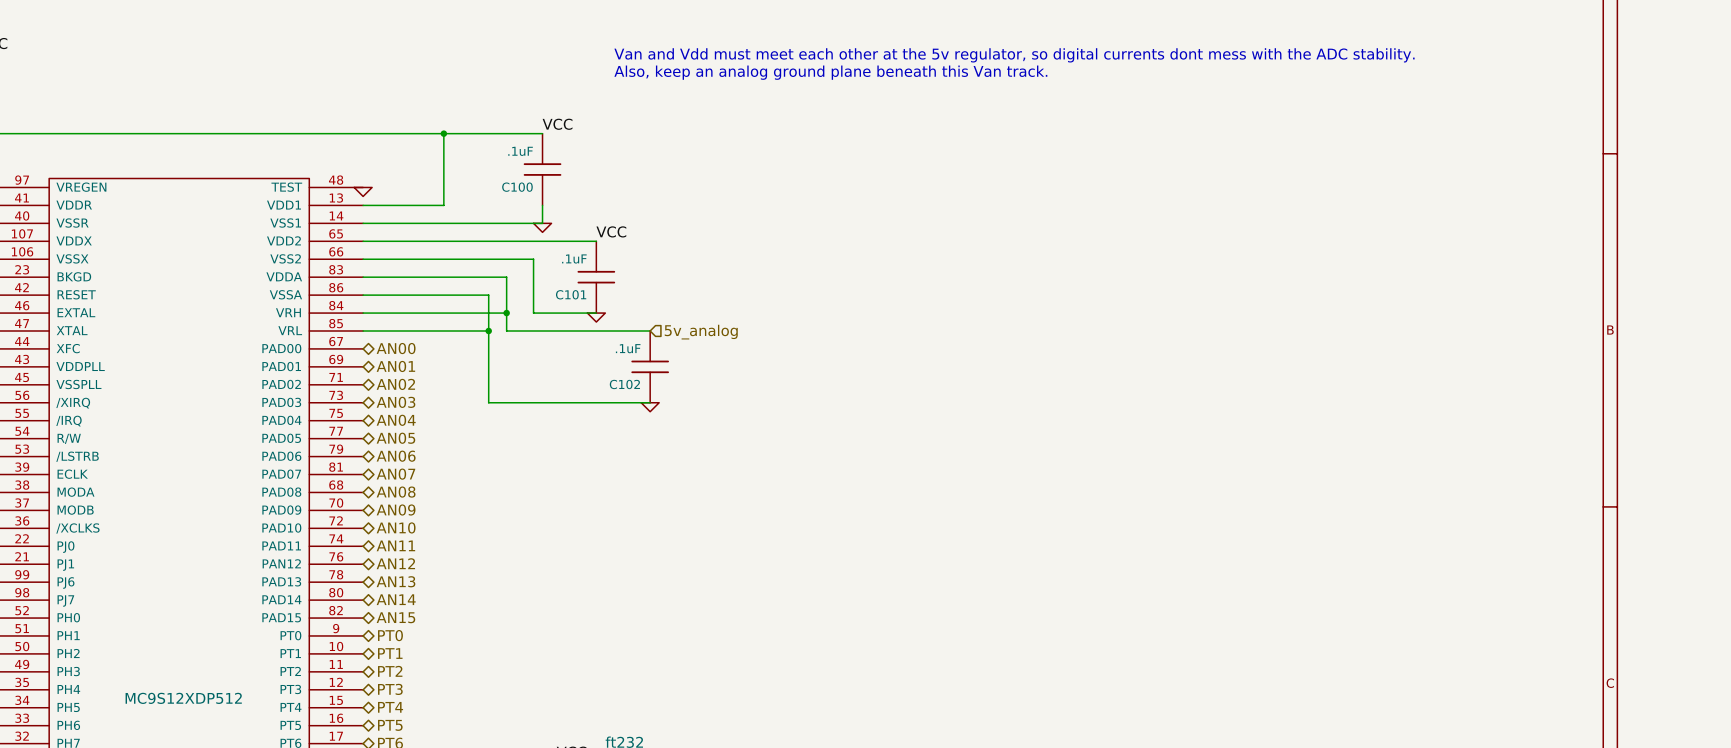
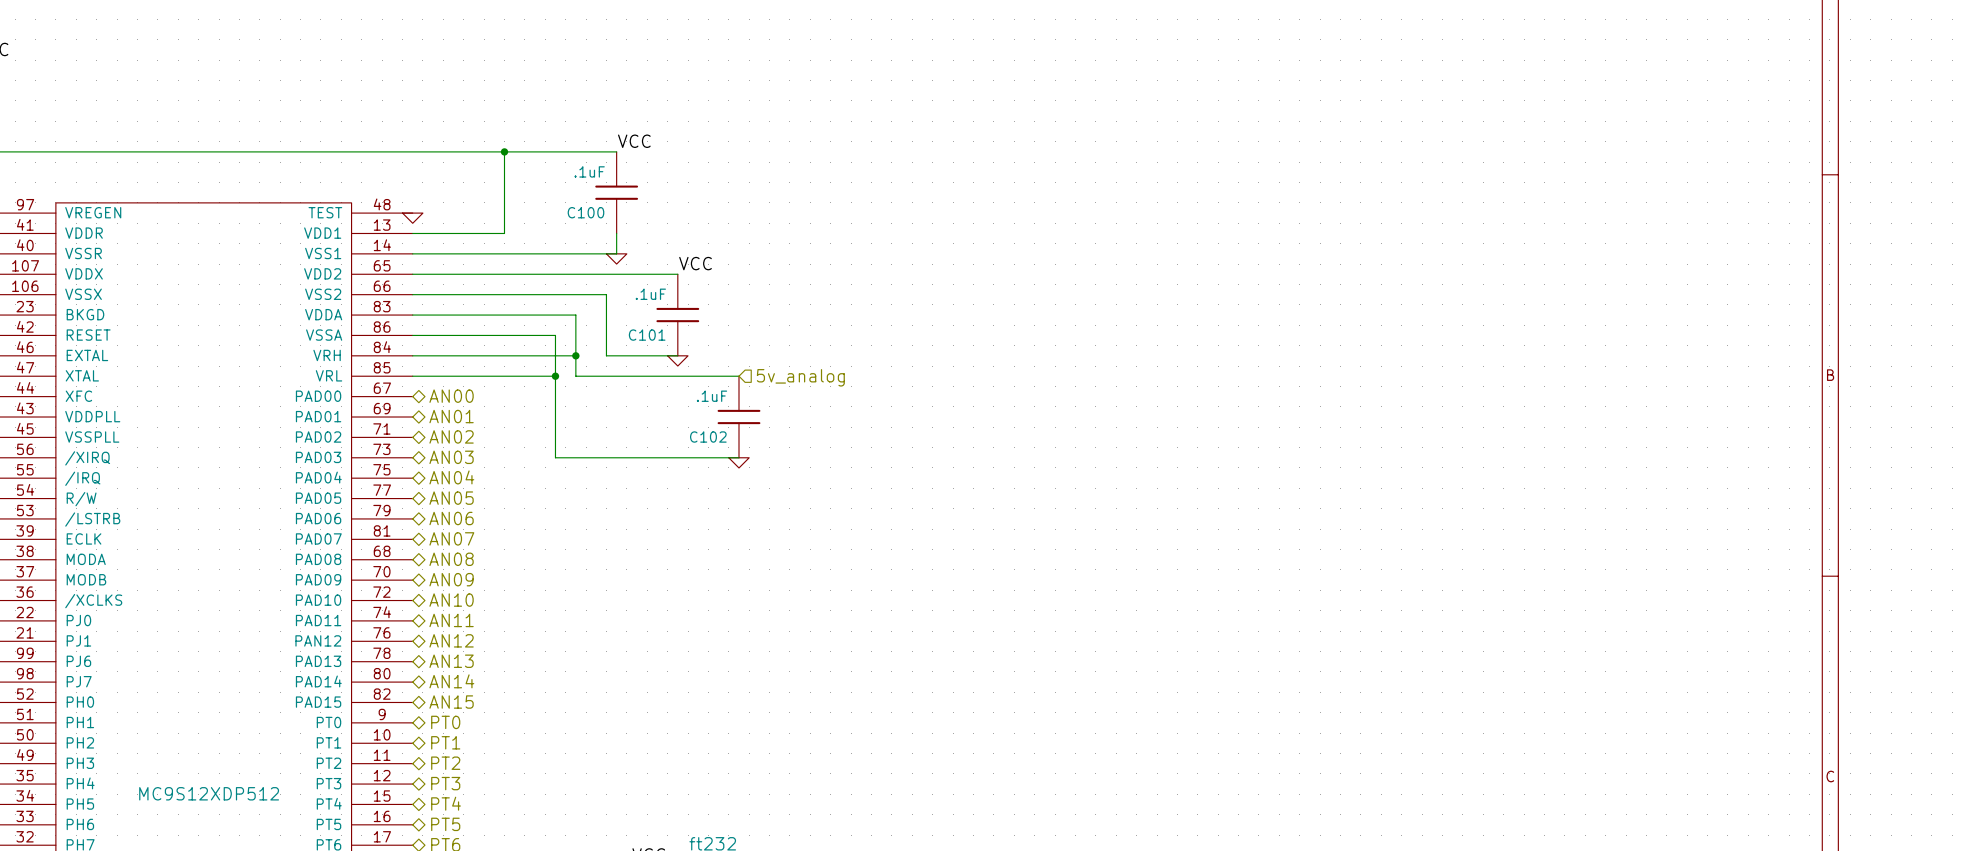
text: Van and Vdd must meet each other at the 5v regulator, so digital currents dont mess with the ADC stability. (1014, 55) -> none
text: Also, keep an analog ground plane beneath this Van track. (830, 72) -> none

